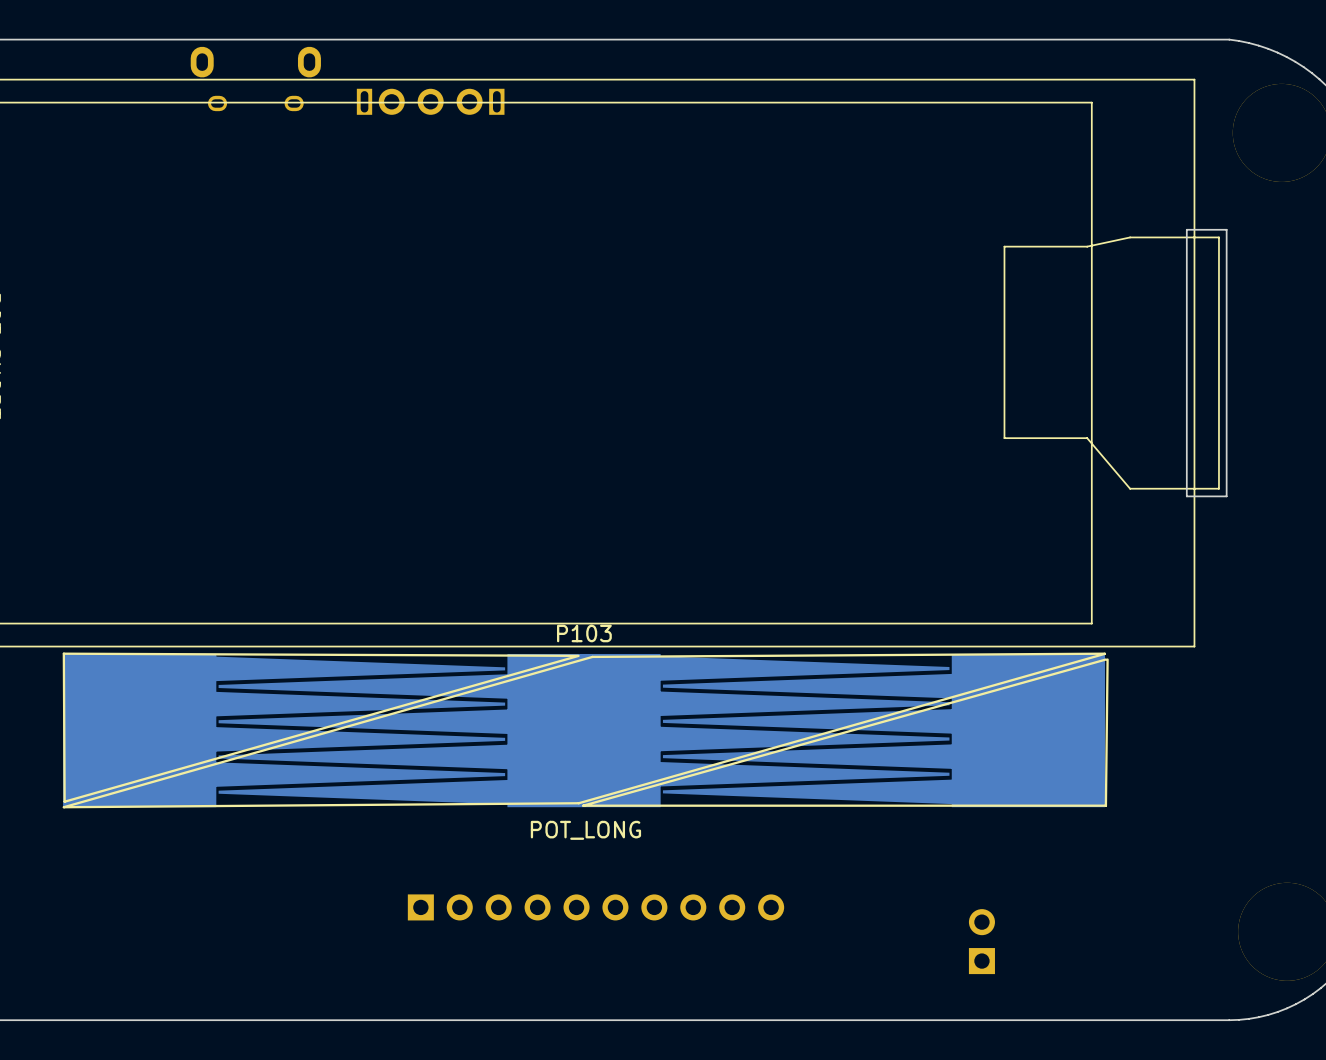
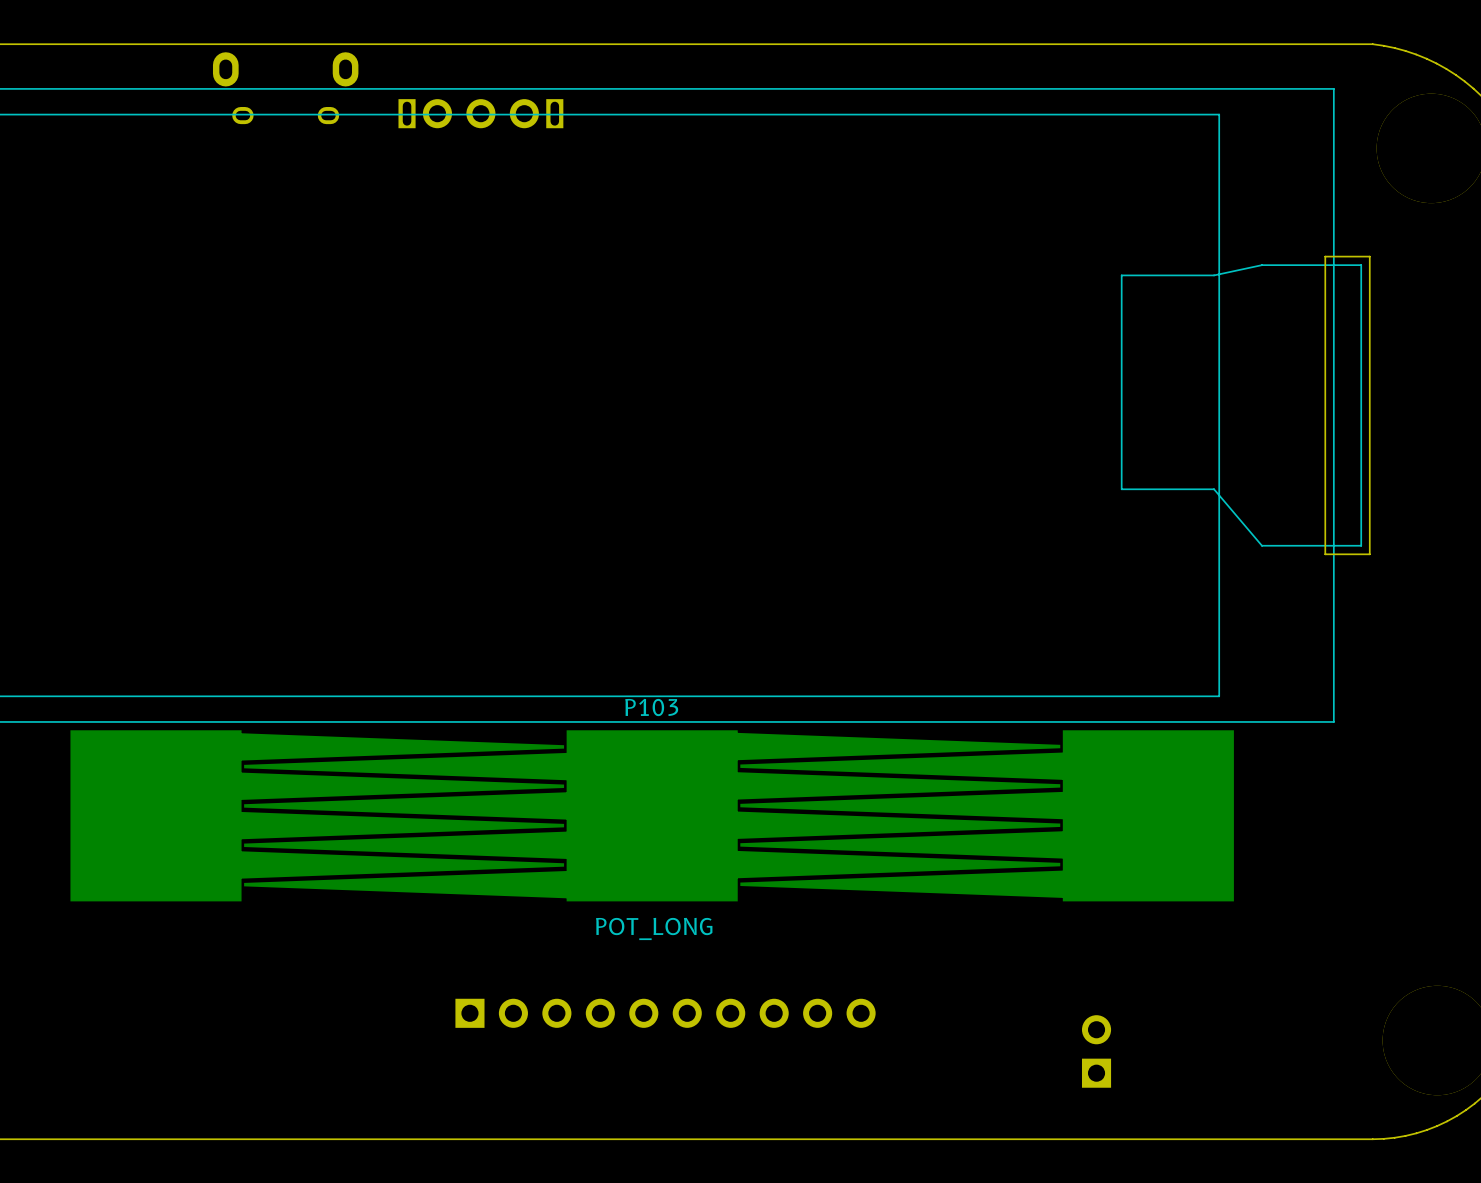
line: (1104, 653) (592, 656) (63, 807) (578, 803) (1104, 653) -> none
line: (578, 655) (63, 653) (64, 801) (578, 655) -> none
line: (1107, 659) (1105, 805) (583, 805) (1105, 659) -> none

